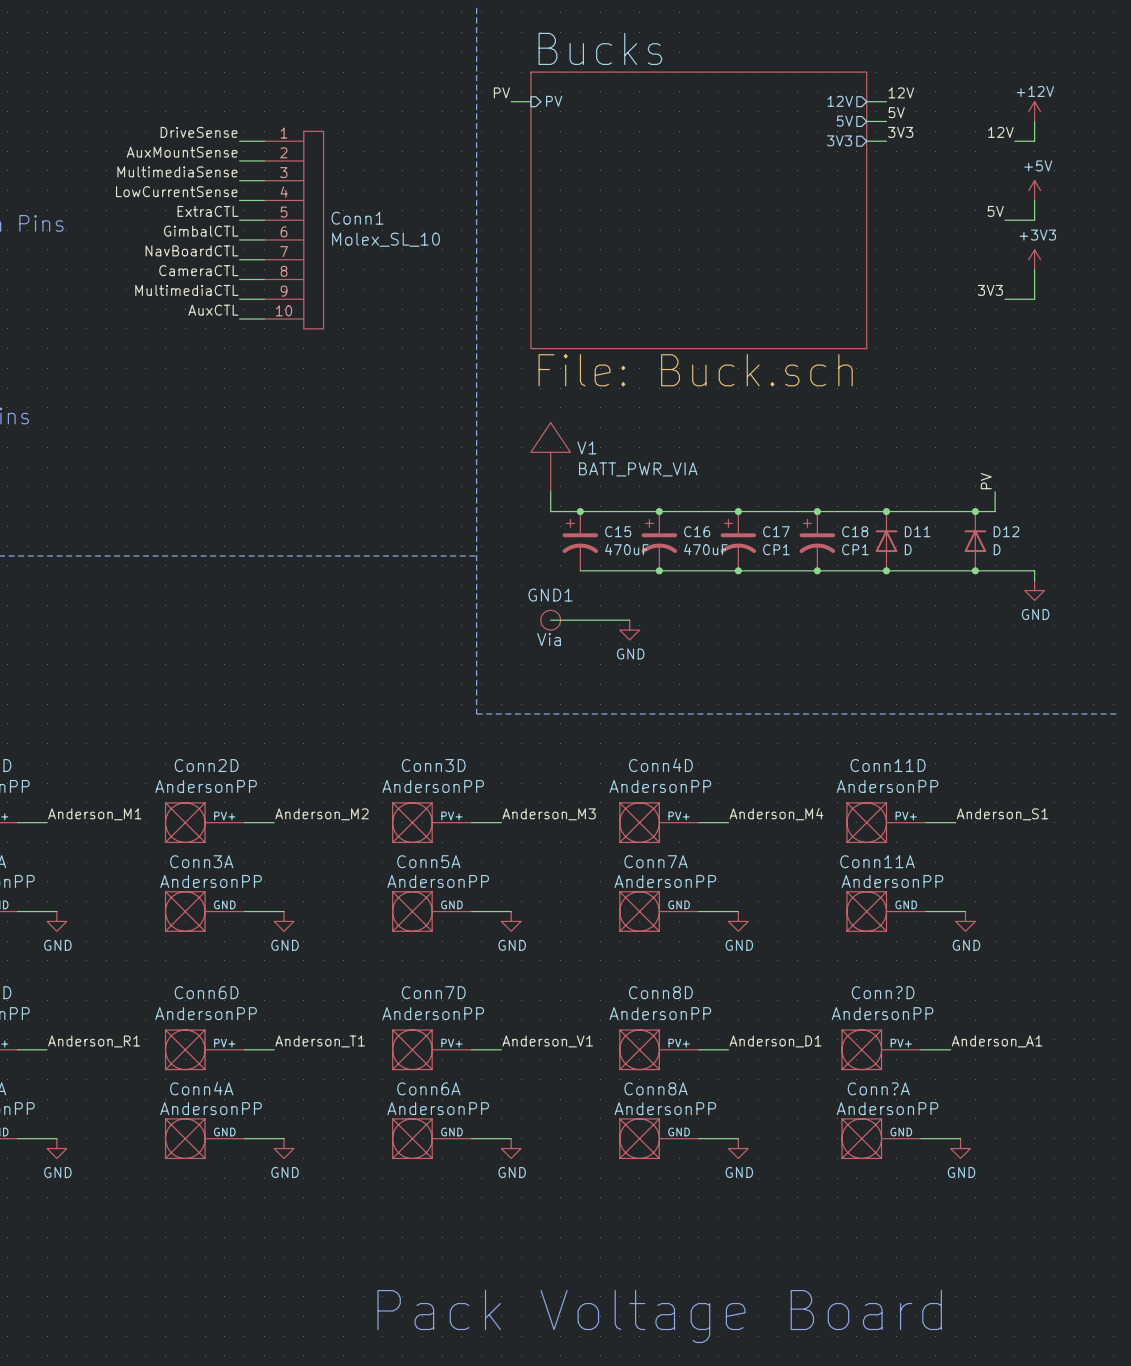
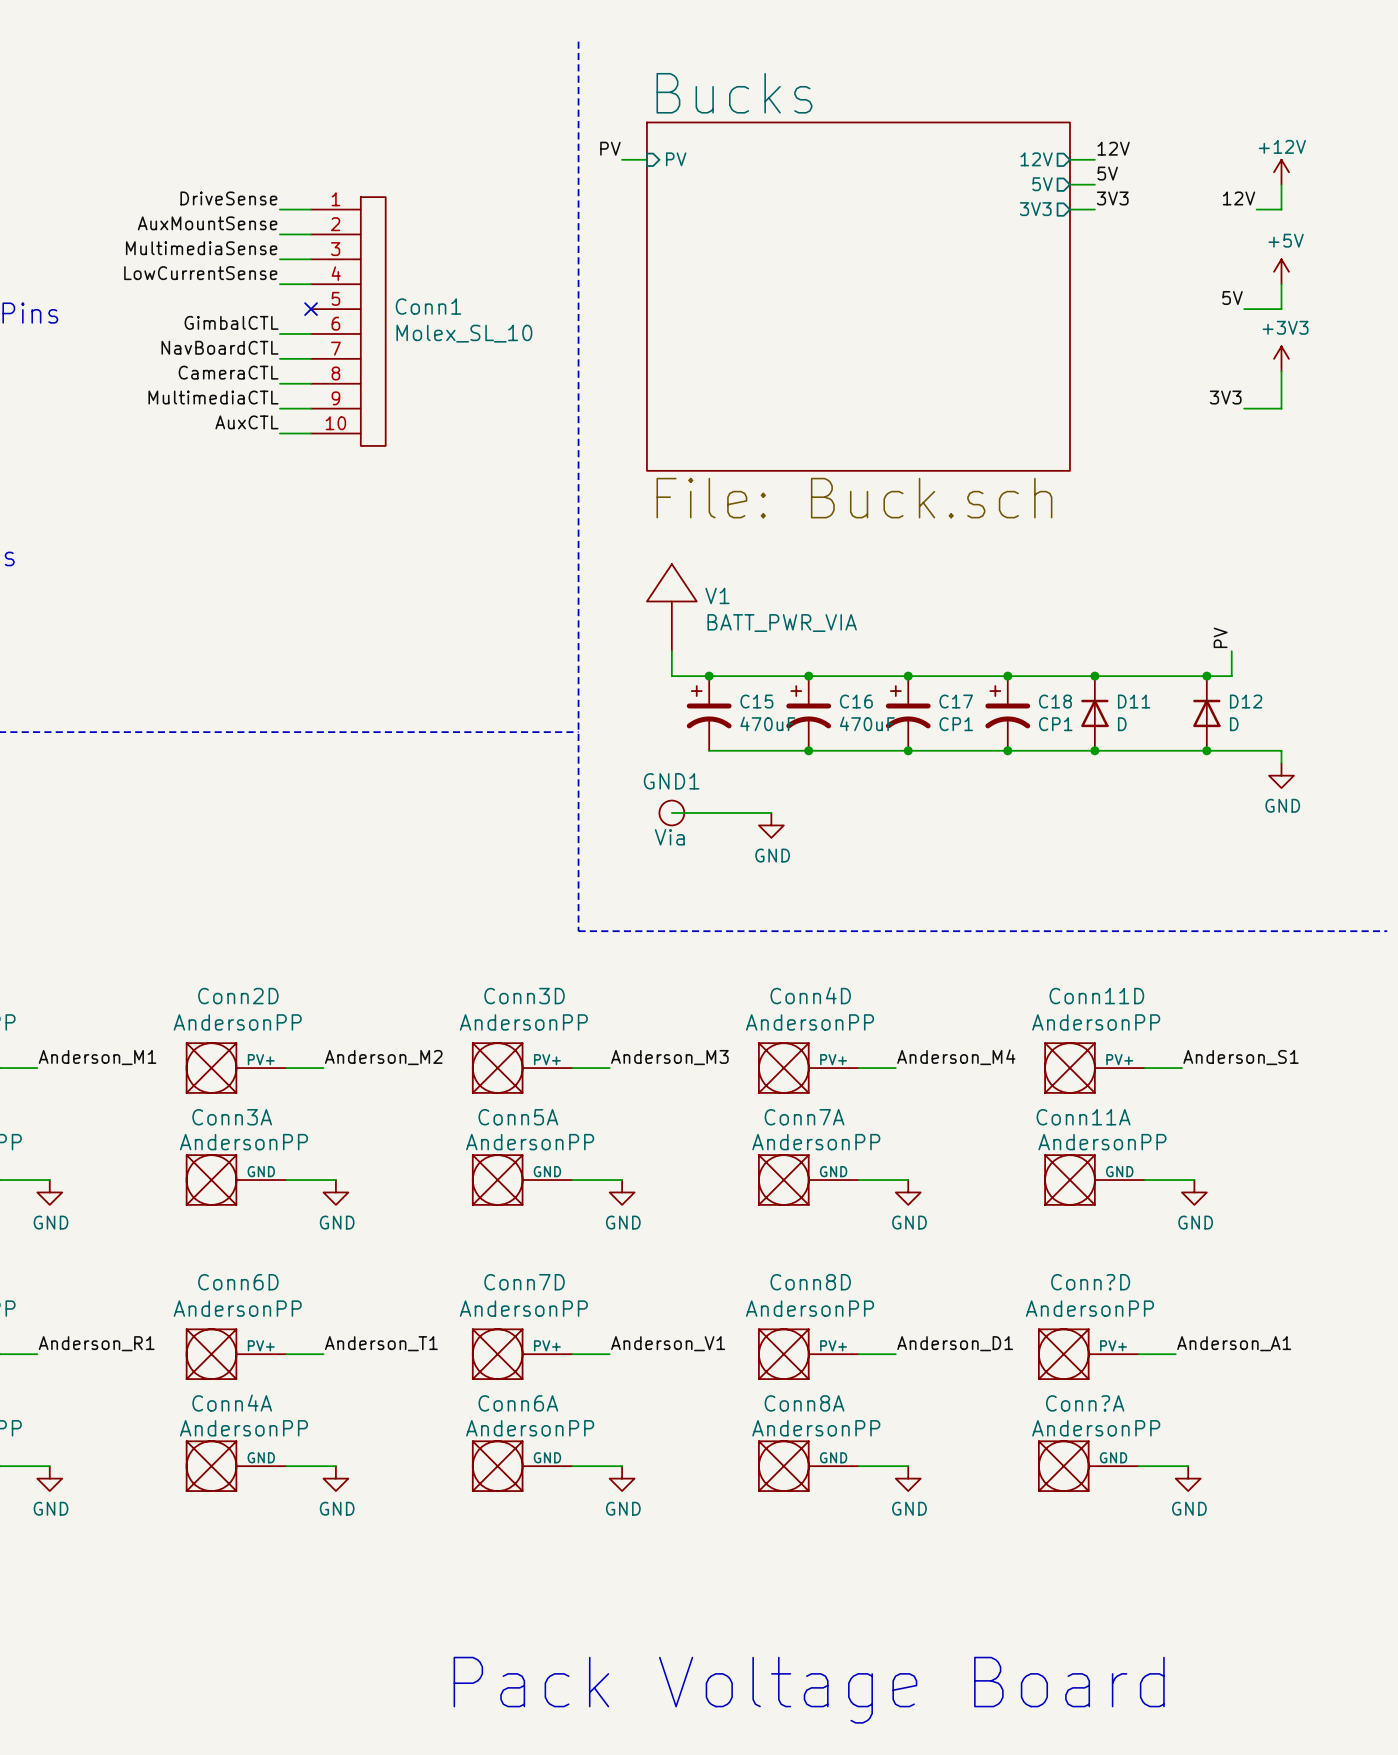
label: ExtraCTL (208, 211) -> none
wire: (239, 220) (264, 220) -> none
no-connect mark: none -> (311, 309)

